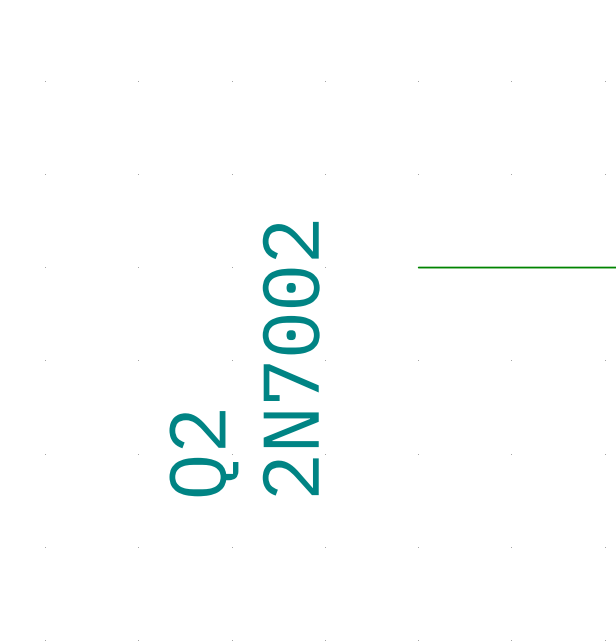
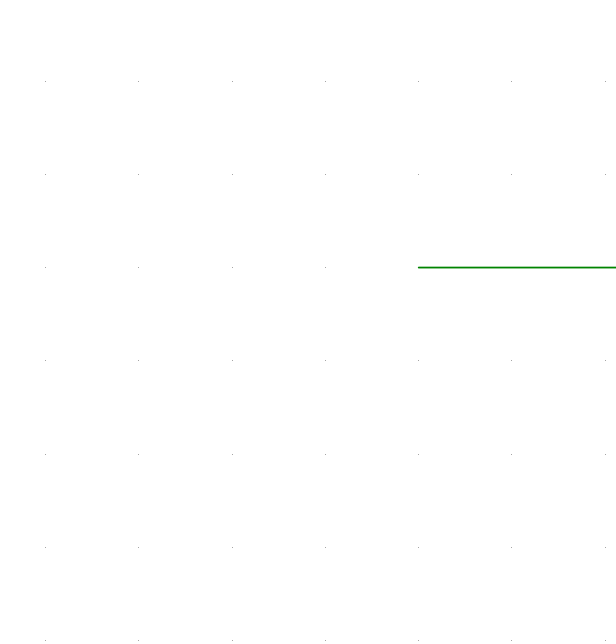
Q2: 2N7002 (244, 359) -> none

